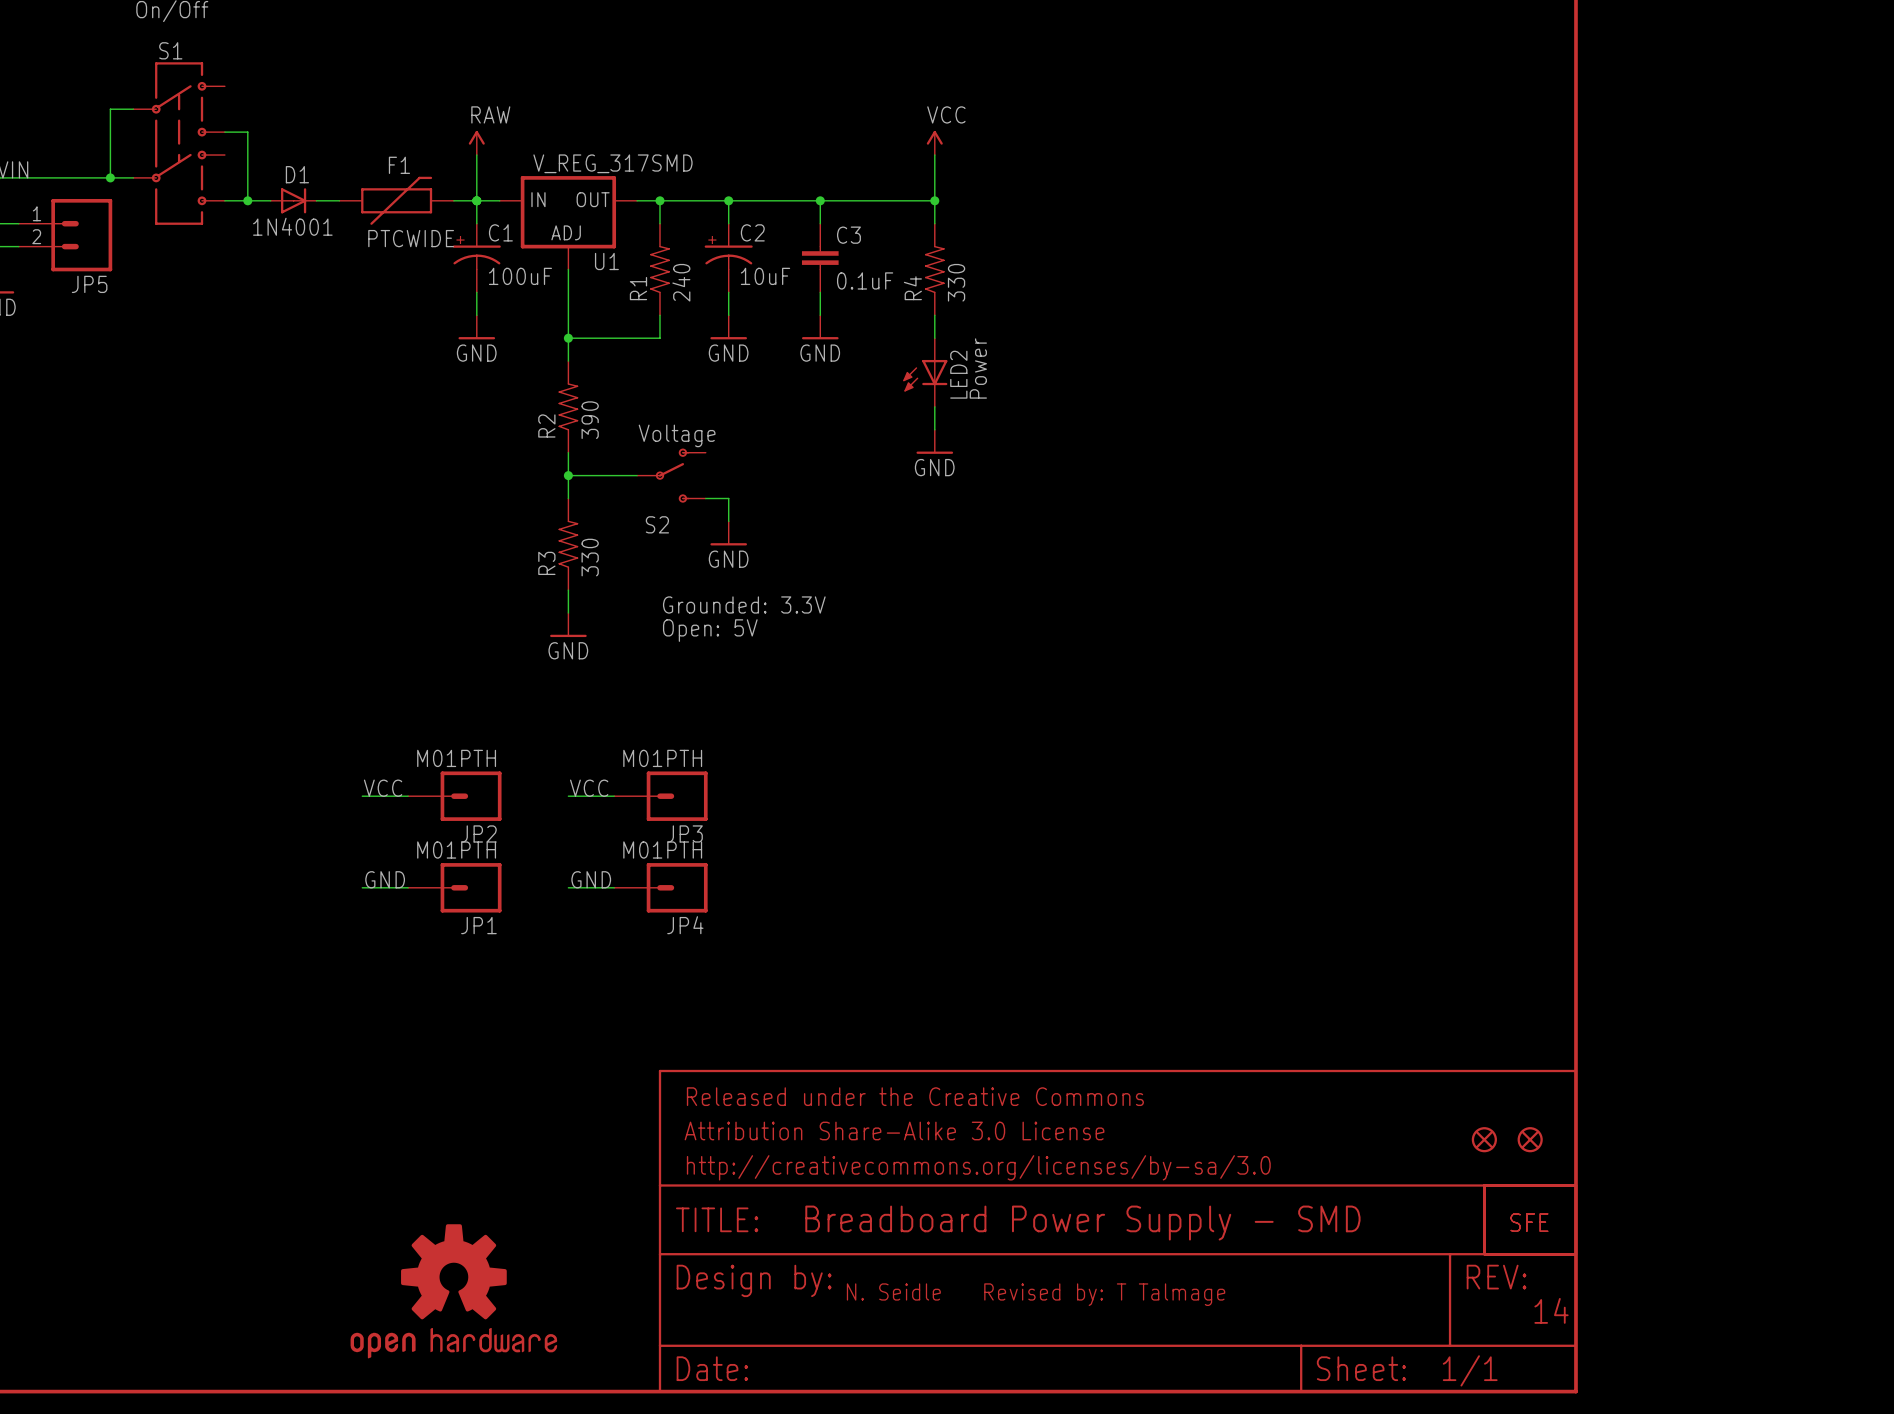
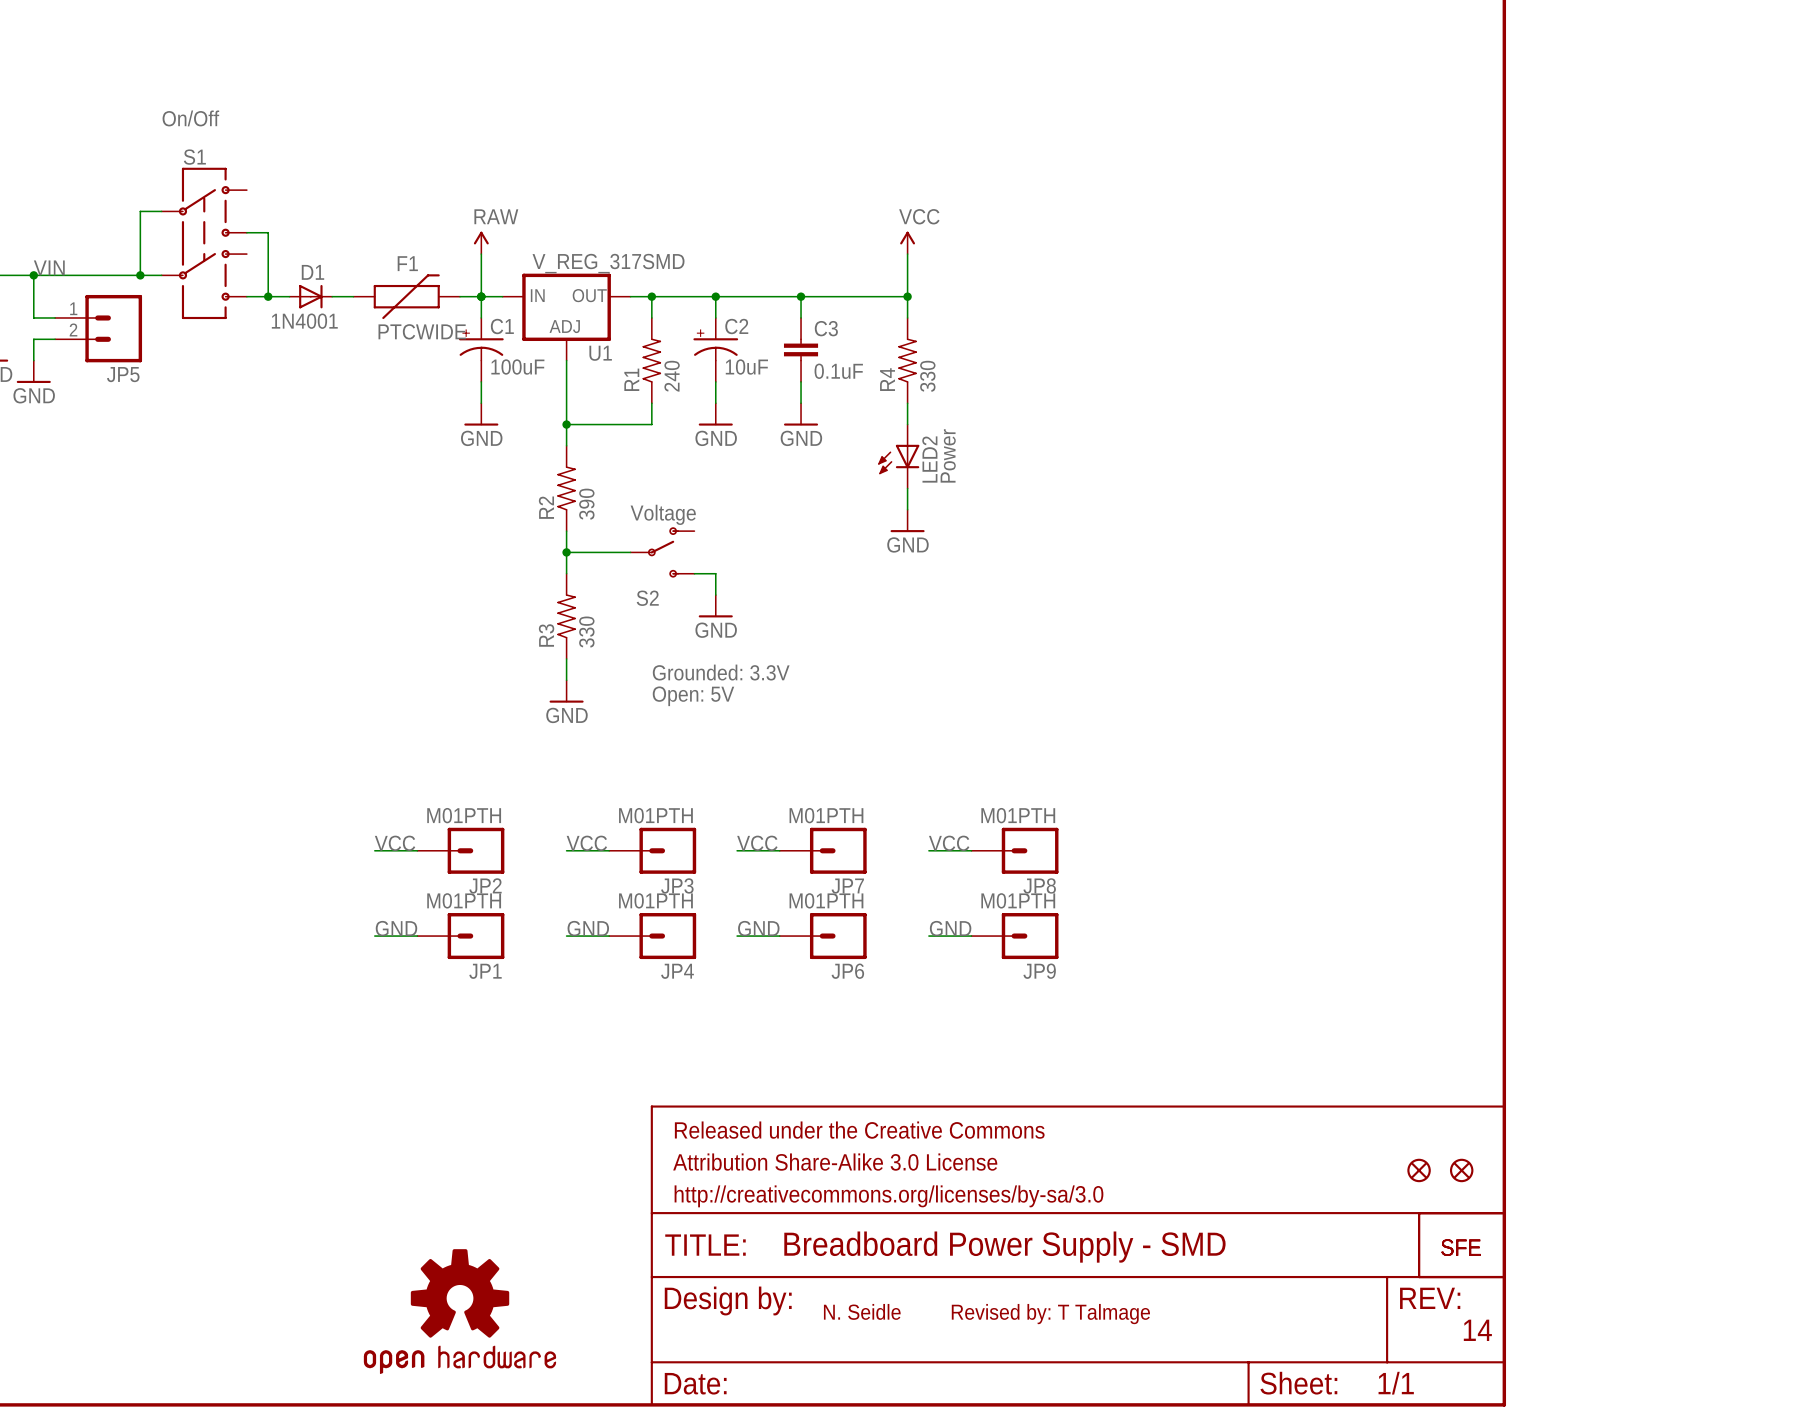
label: none -> VCC (757, 843)
label: none -> VCC (949, 843)
wire: none -> (737, 850) (779, 850)
JP7: none -> M01PTH (823, 850)
wire: none -> (928, 850) (971, 850)
JP8: none -> M01PTH (1014, 850)
label: none -> GND (758, 928)
label: none -> GND (950, 928)
wire: none -> (737, 936) (779, 936)
JP6: none -> M01PTH (823, 936)
wire: none -> (928, 936) (971, 936)
JP9: none -> M01PTH (1014, 936)

